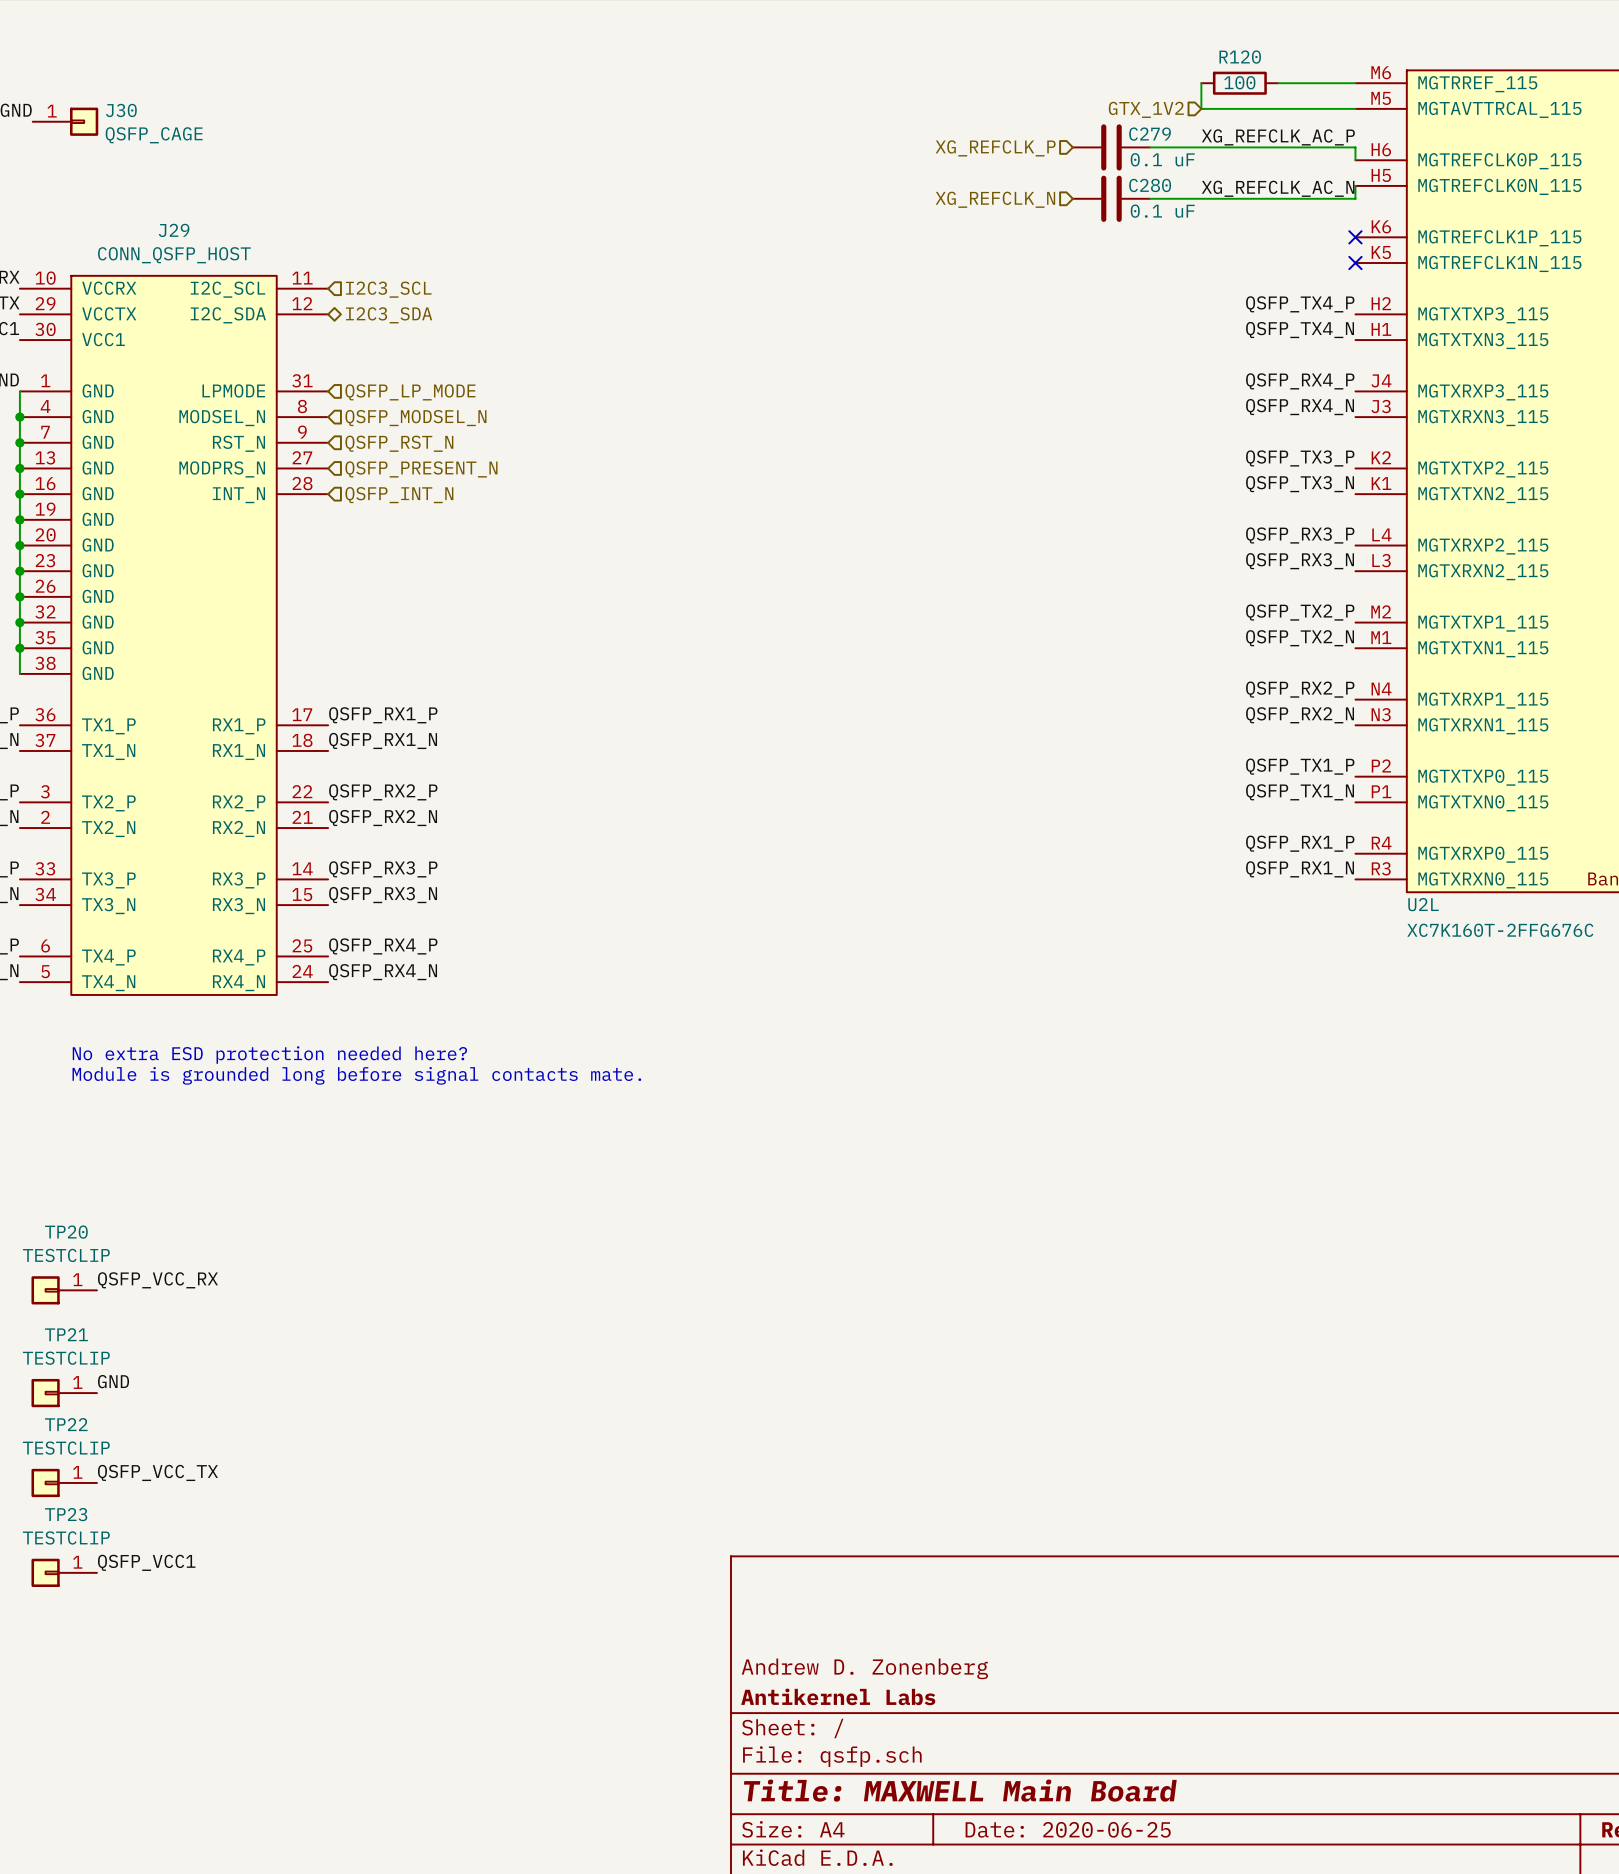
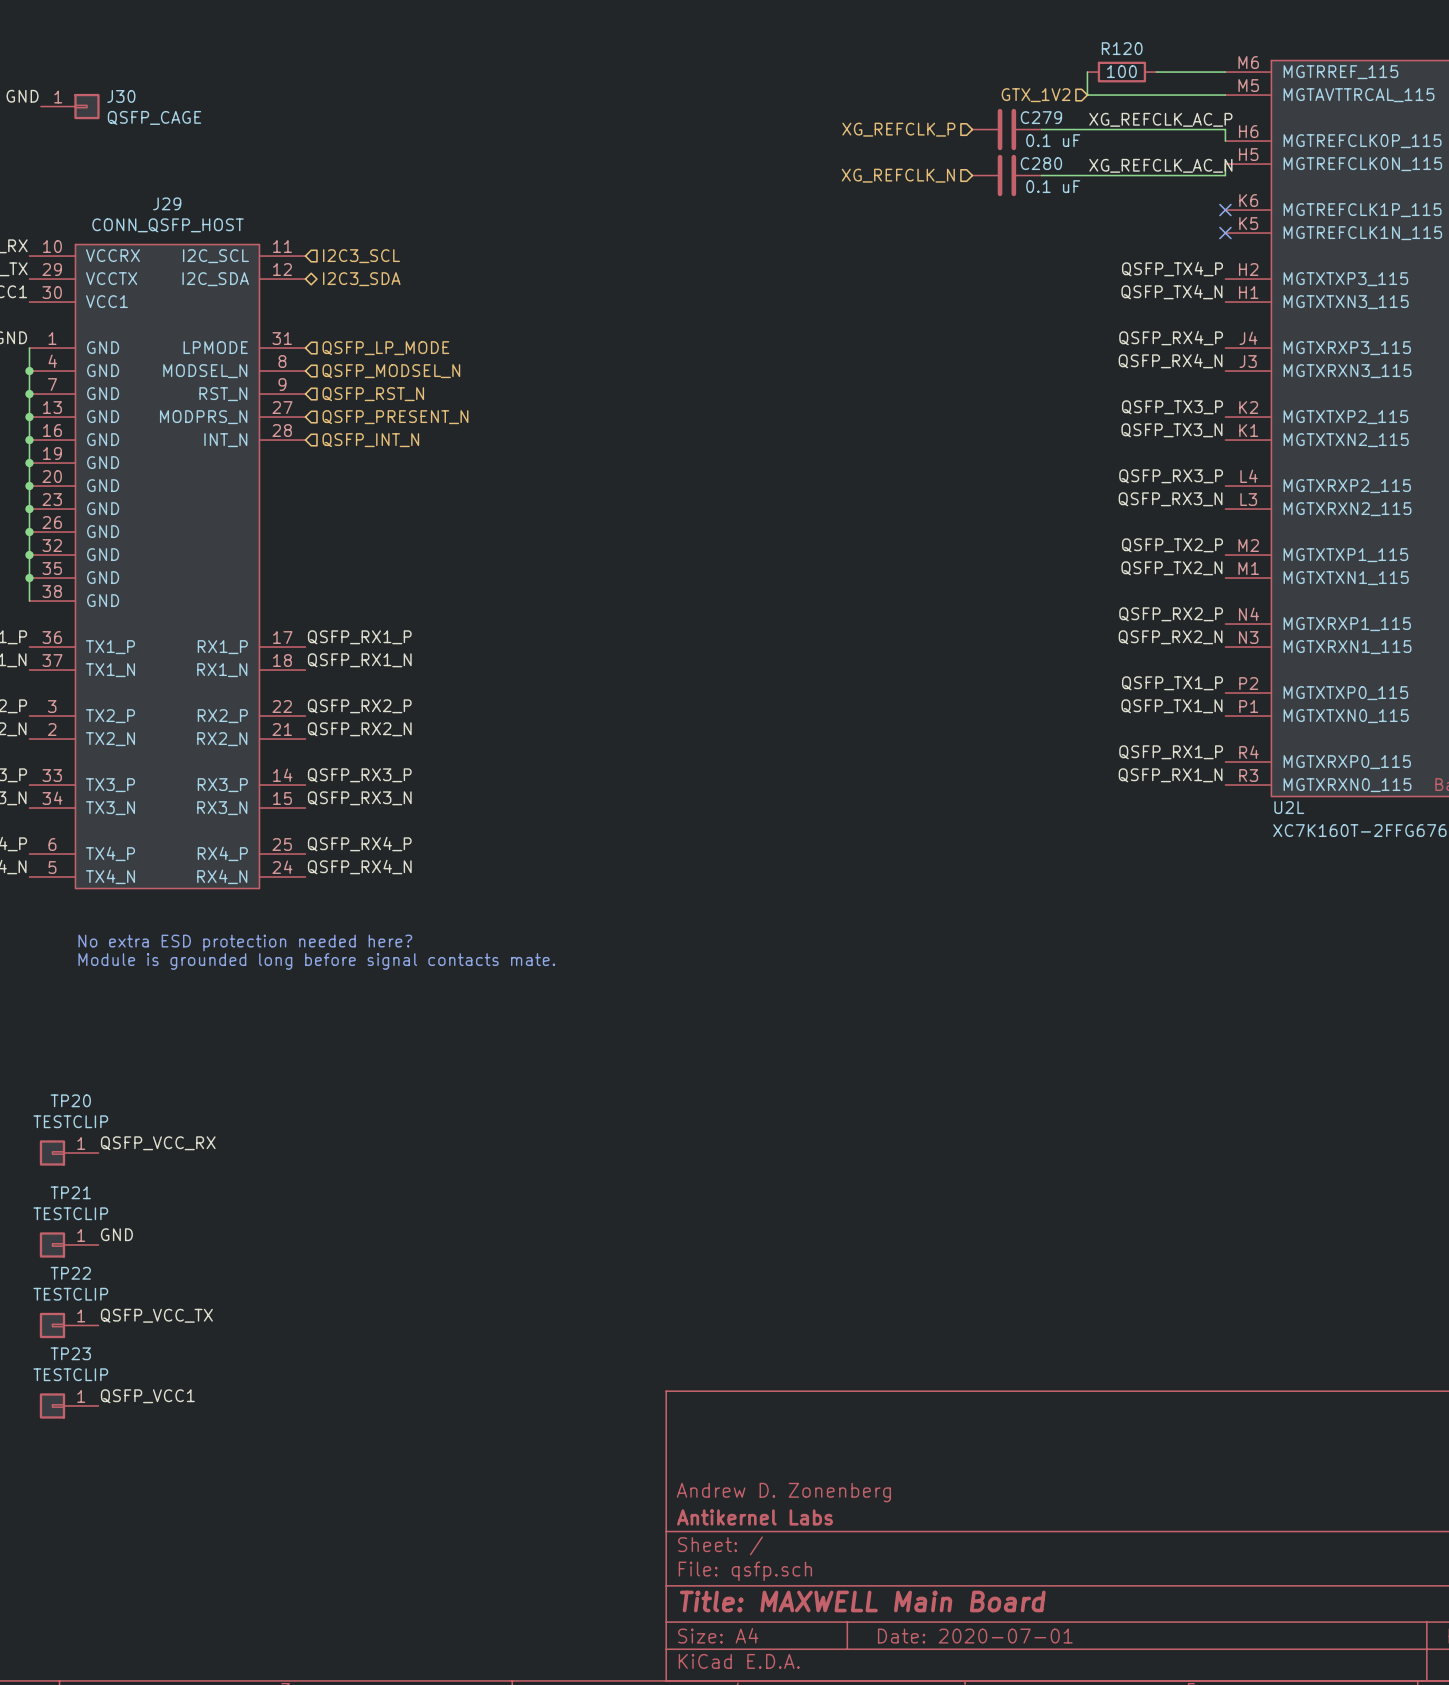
title block: Date: 2020-06-25 (1068, 1829) -> Date: 2020-07-01 (975, 1636)

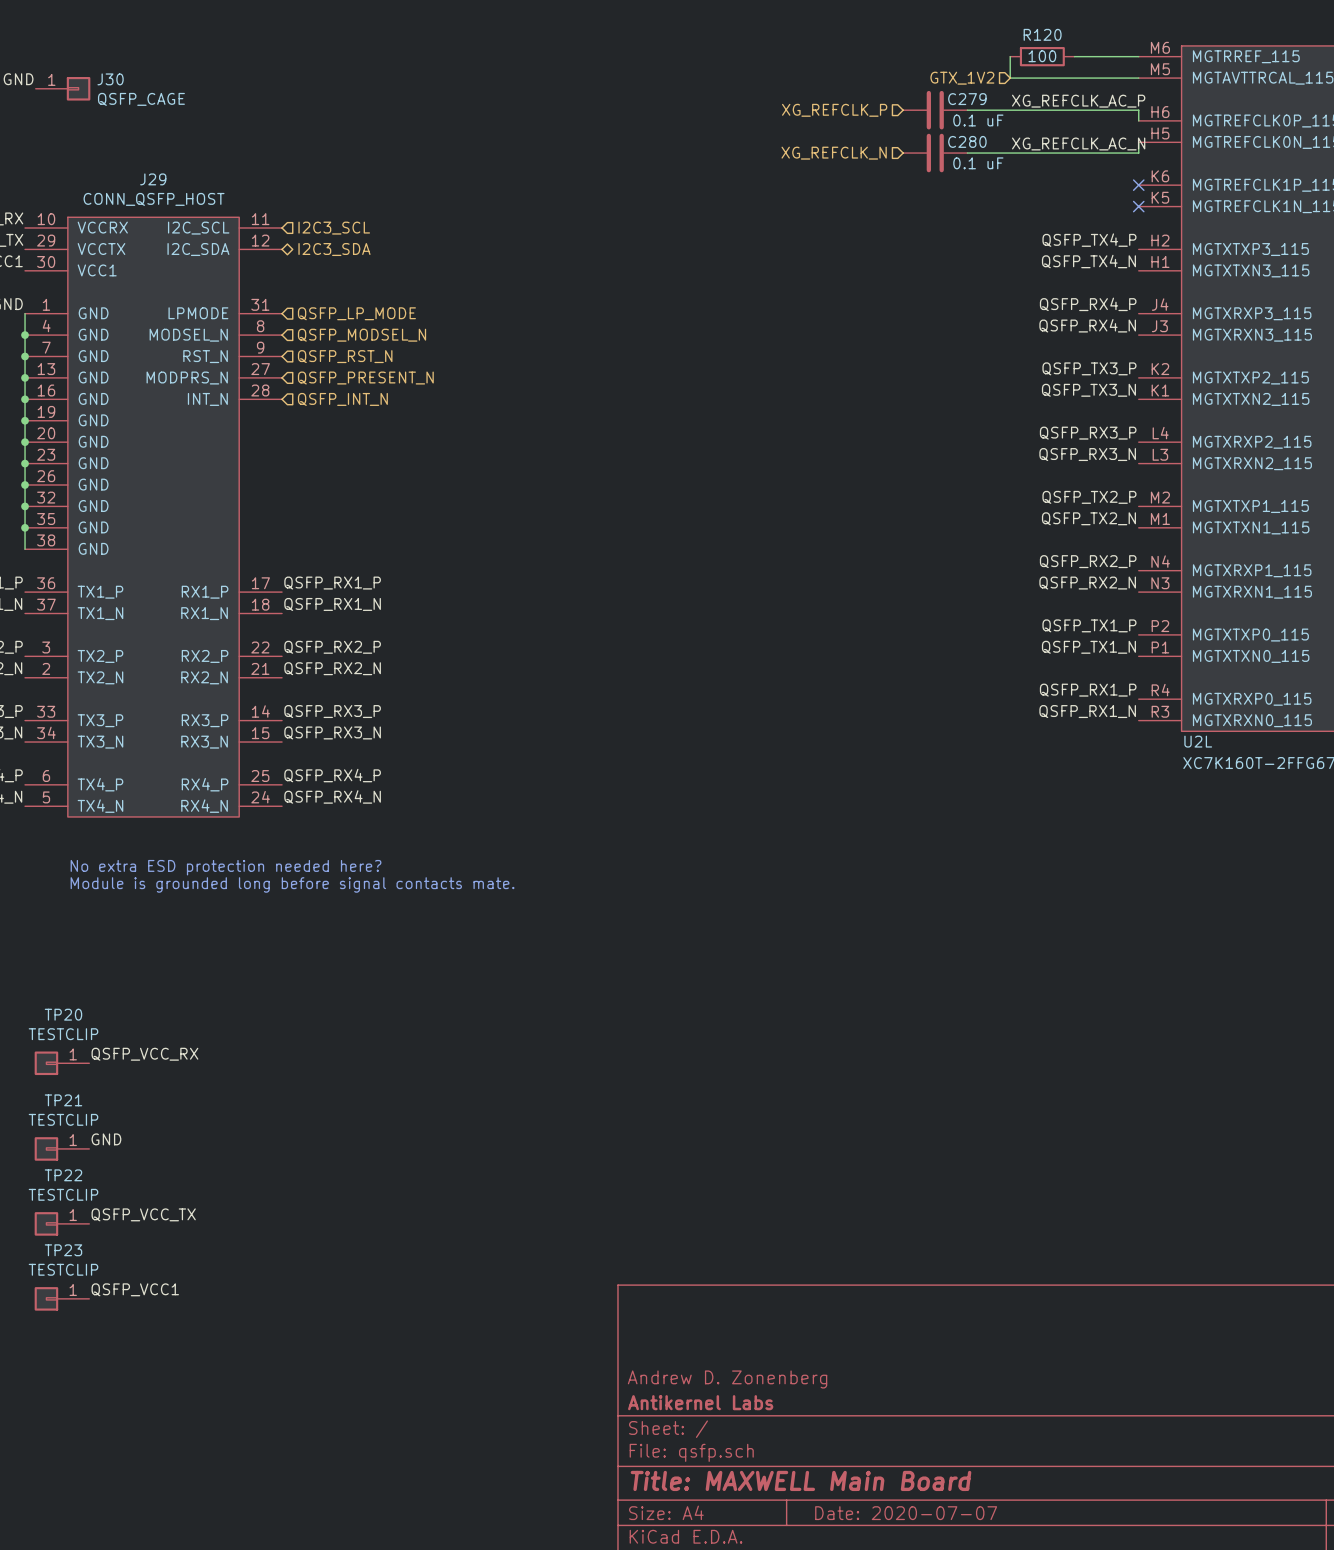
title block: Date: 2020-07-01 (975, 1636) -> Date: 2020-07-07 (906, 1513)

